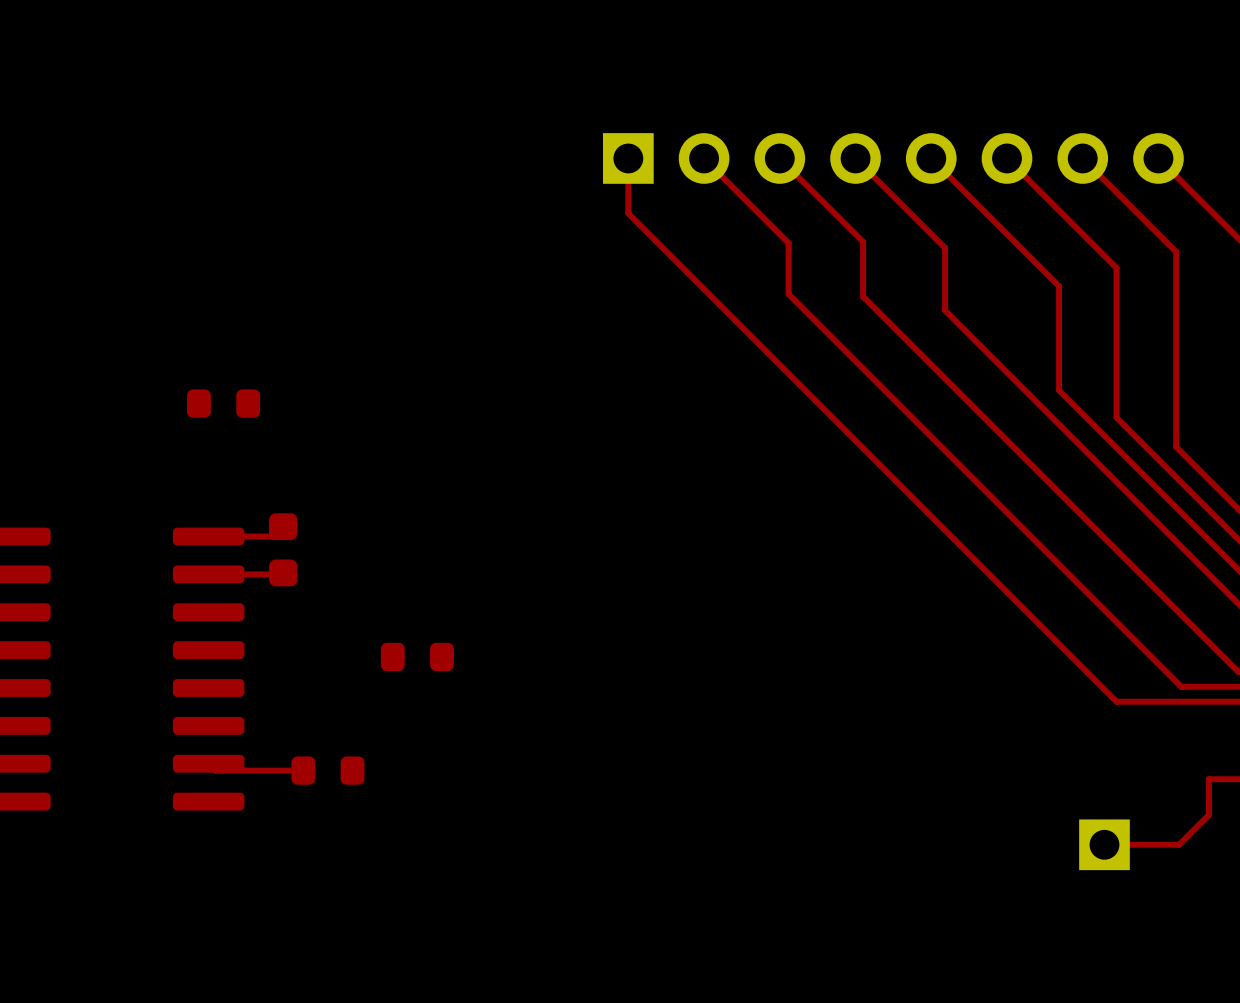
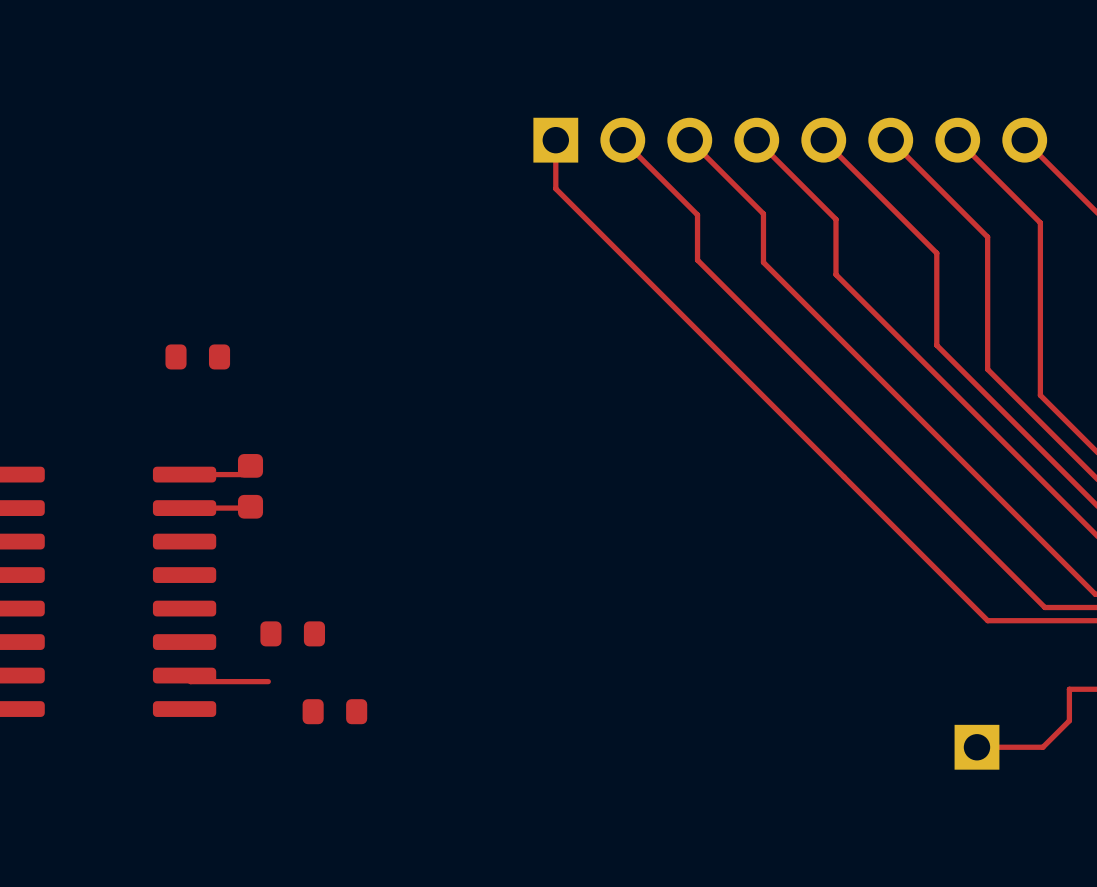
part: (417, 656) -> none
part: none -> (292, 633)
part: (327, 770) -> none
part: none -> (334, 711)

